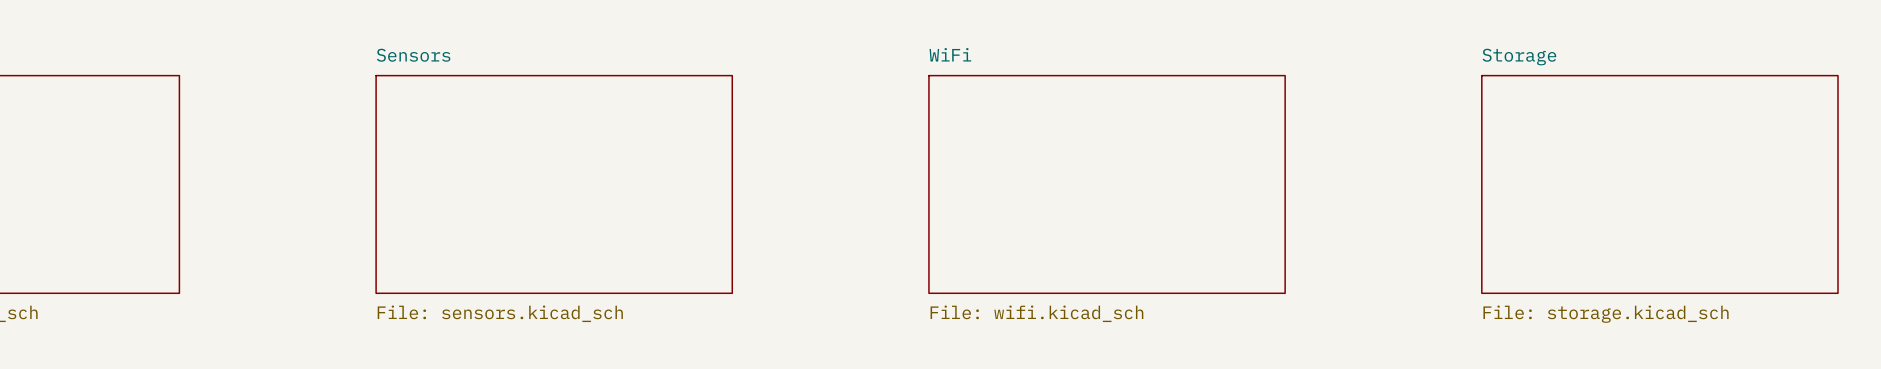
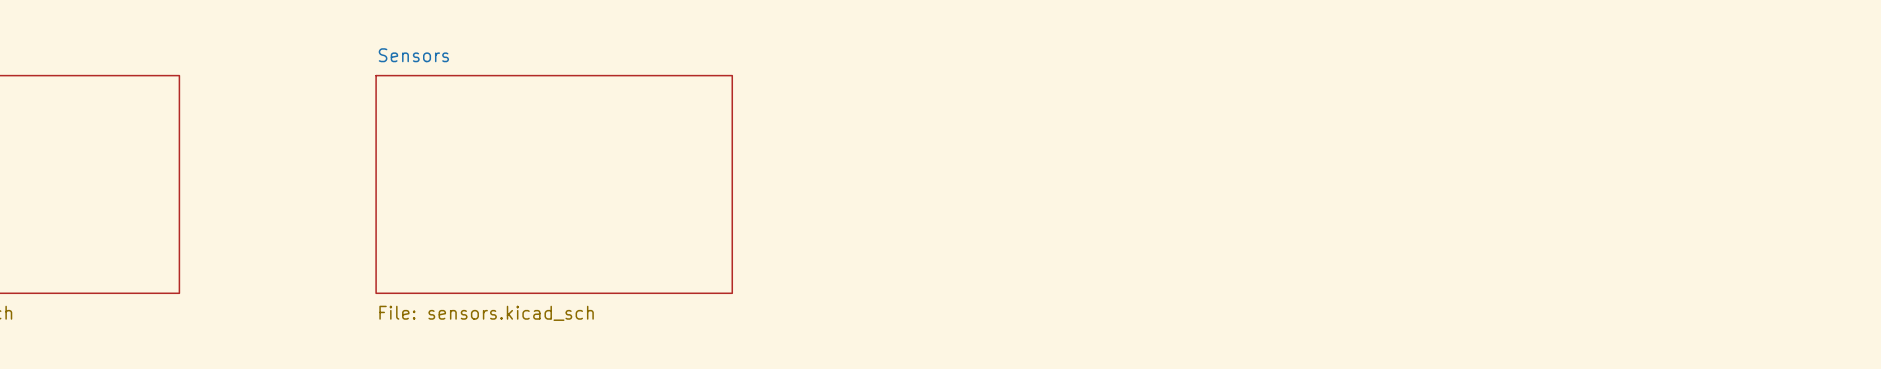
sheet WiFi: File: wifi.kicad_sch (1107, 184) -> none
sheet Storage: File: storage.kicad_sch (1659, 184) -> none

